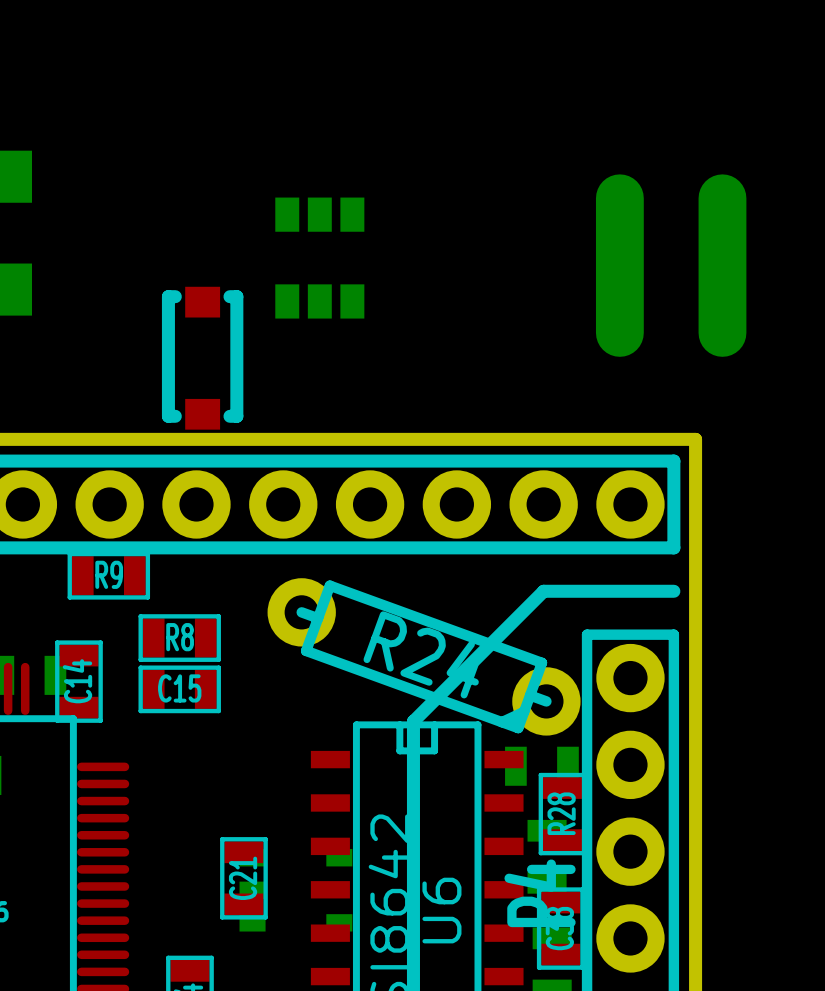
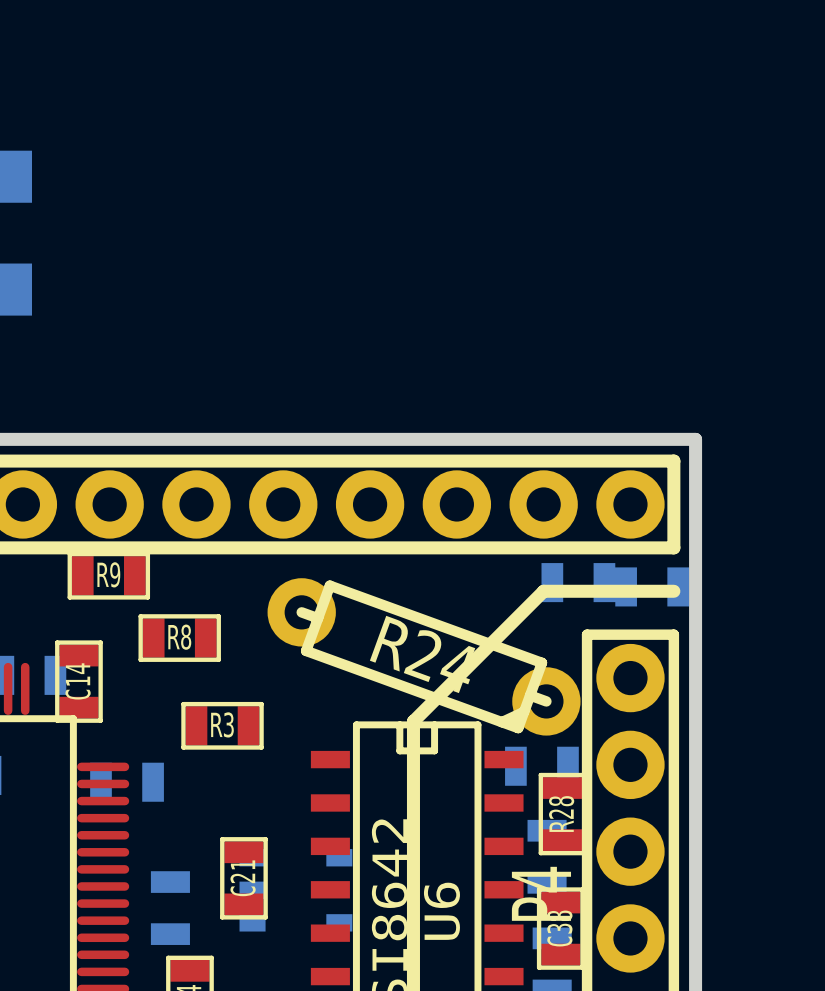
part: (319, 258) -> none
part: (671, 265) -> none
part: (202, 358) -> none
part: none -> (578, 582)
part: none -> (652, 586)
C15: (179, 689) -> none
R3: none -> (222, 725)
part: none -> (127, 782)
part: none -> (170, 908)

